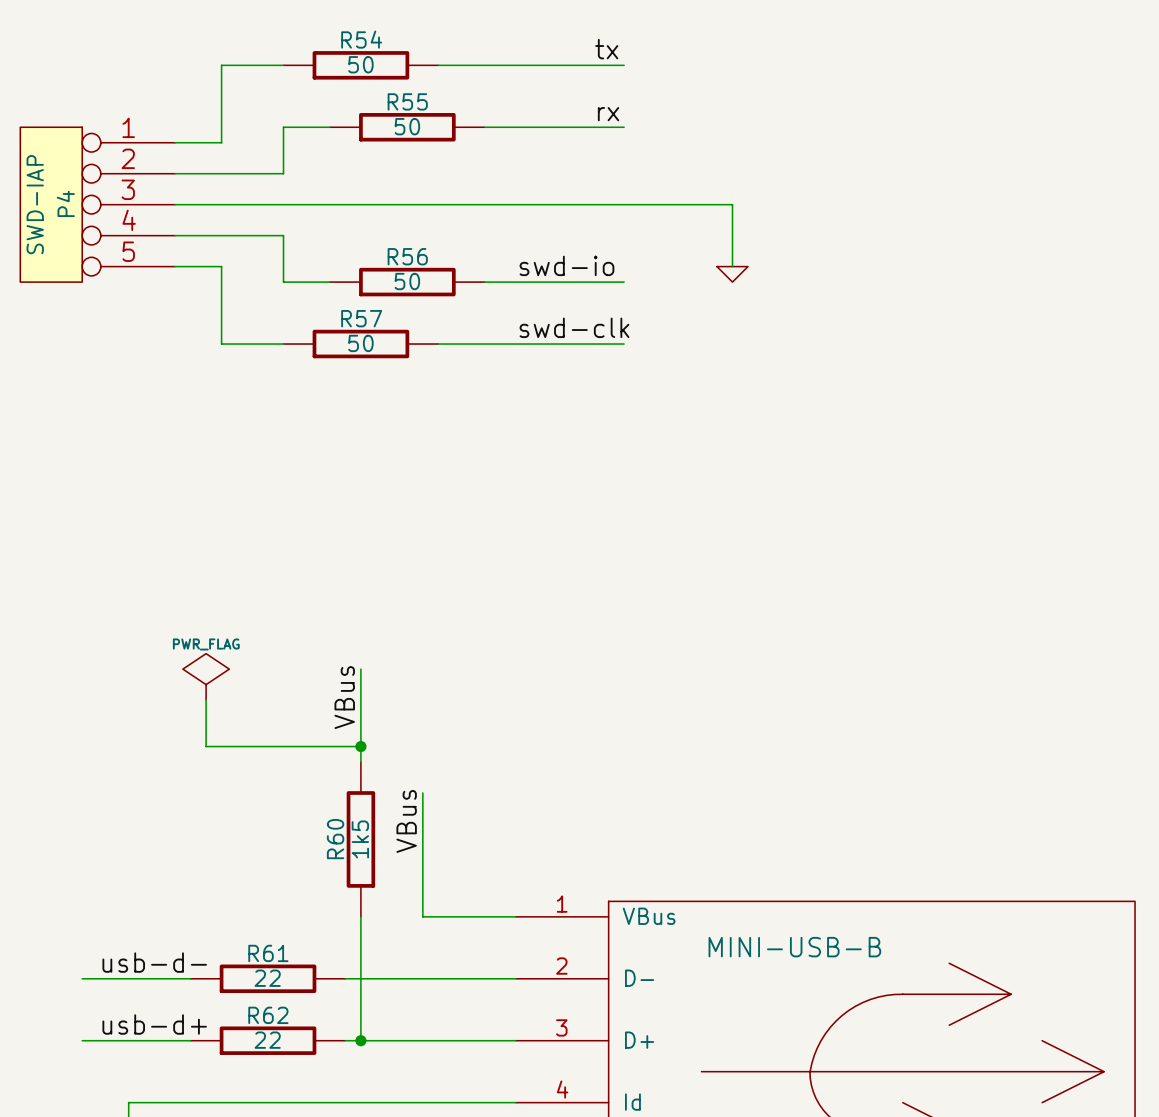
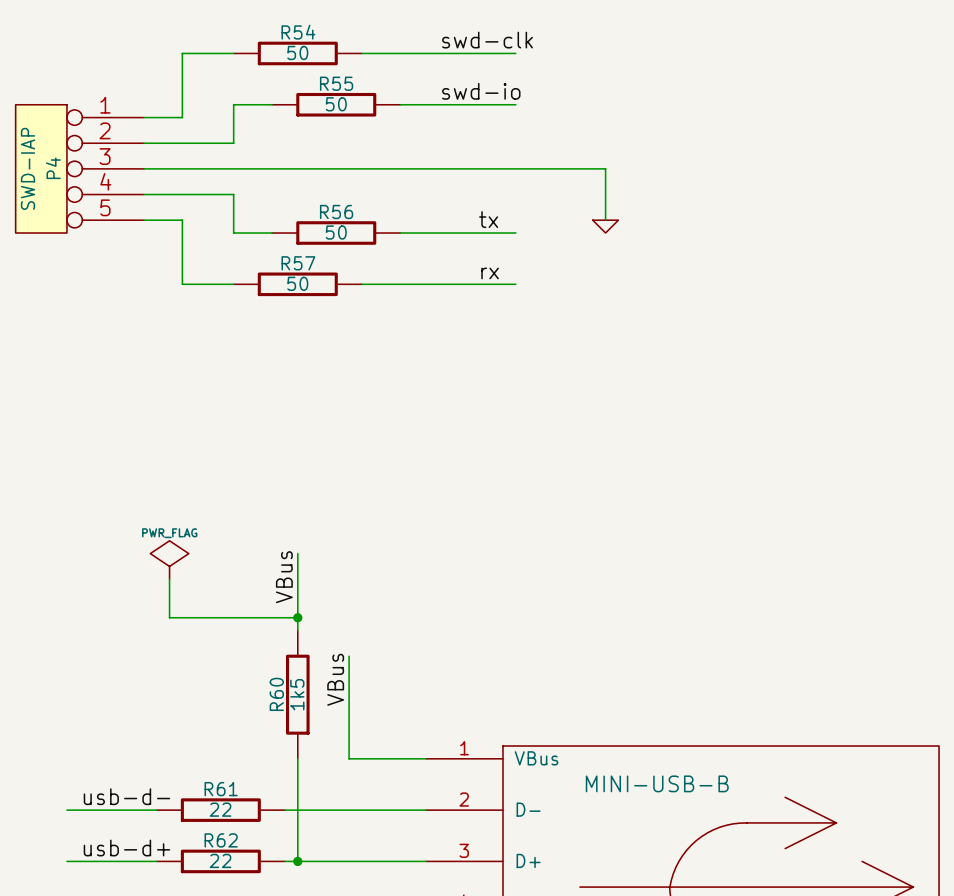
label position: tx (606, 49) -> tx (488, 219)
label position: rx (608, 114) -> rx (490, 273)
label position: swd-io (566, 265) -> swd-io (481, 91)
label position: swd-clk (574, 327) -> swd-clk (487, 40)

